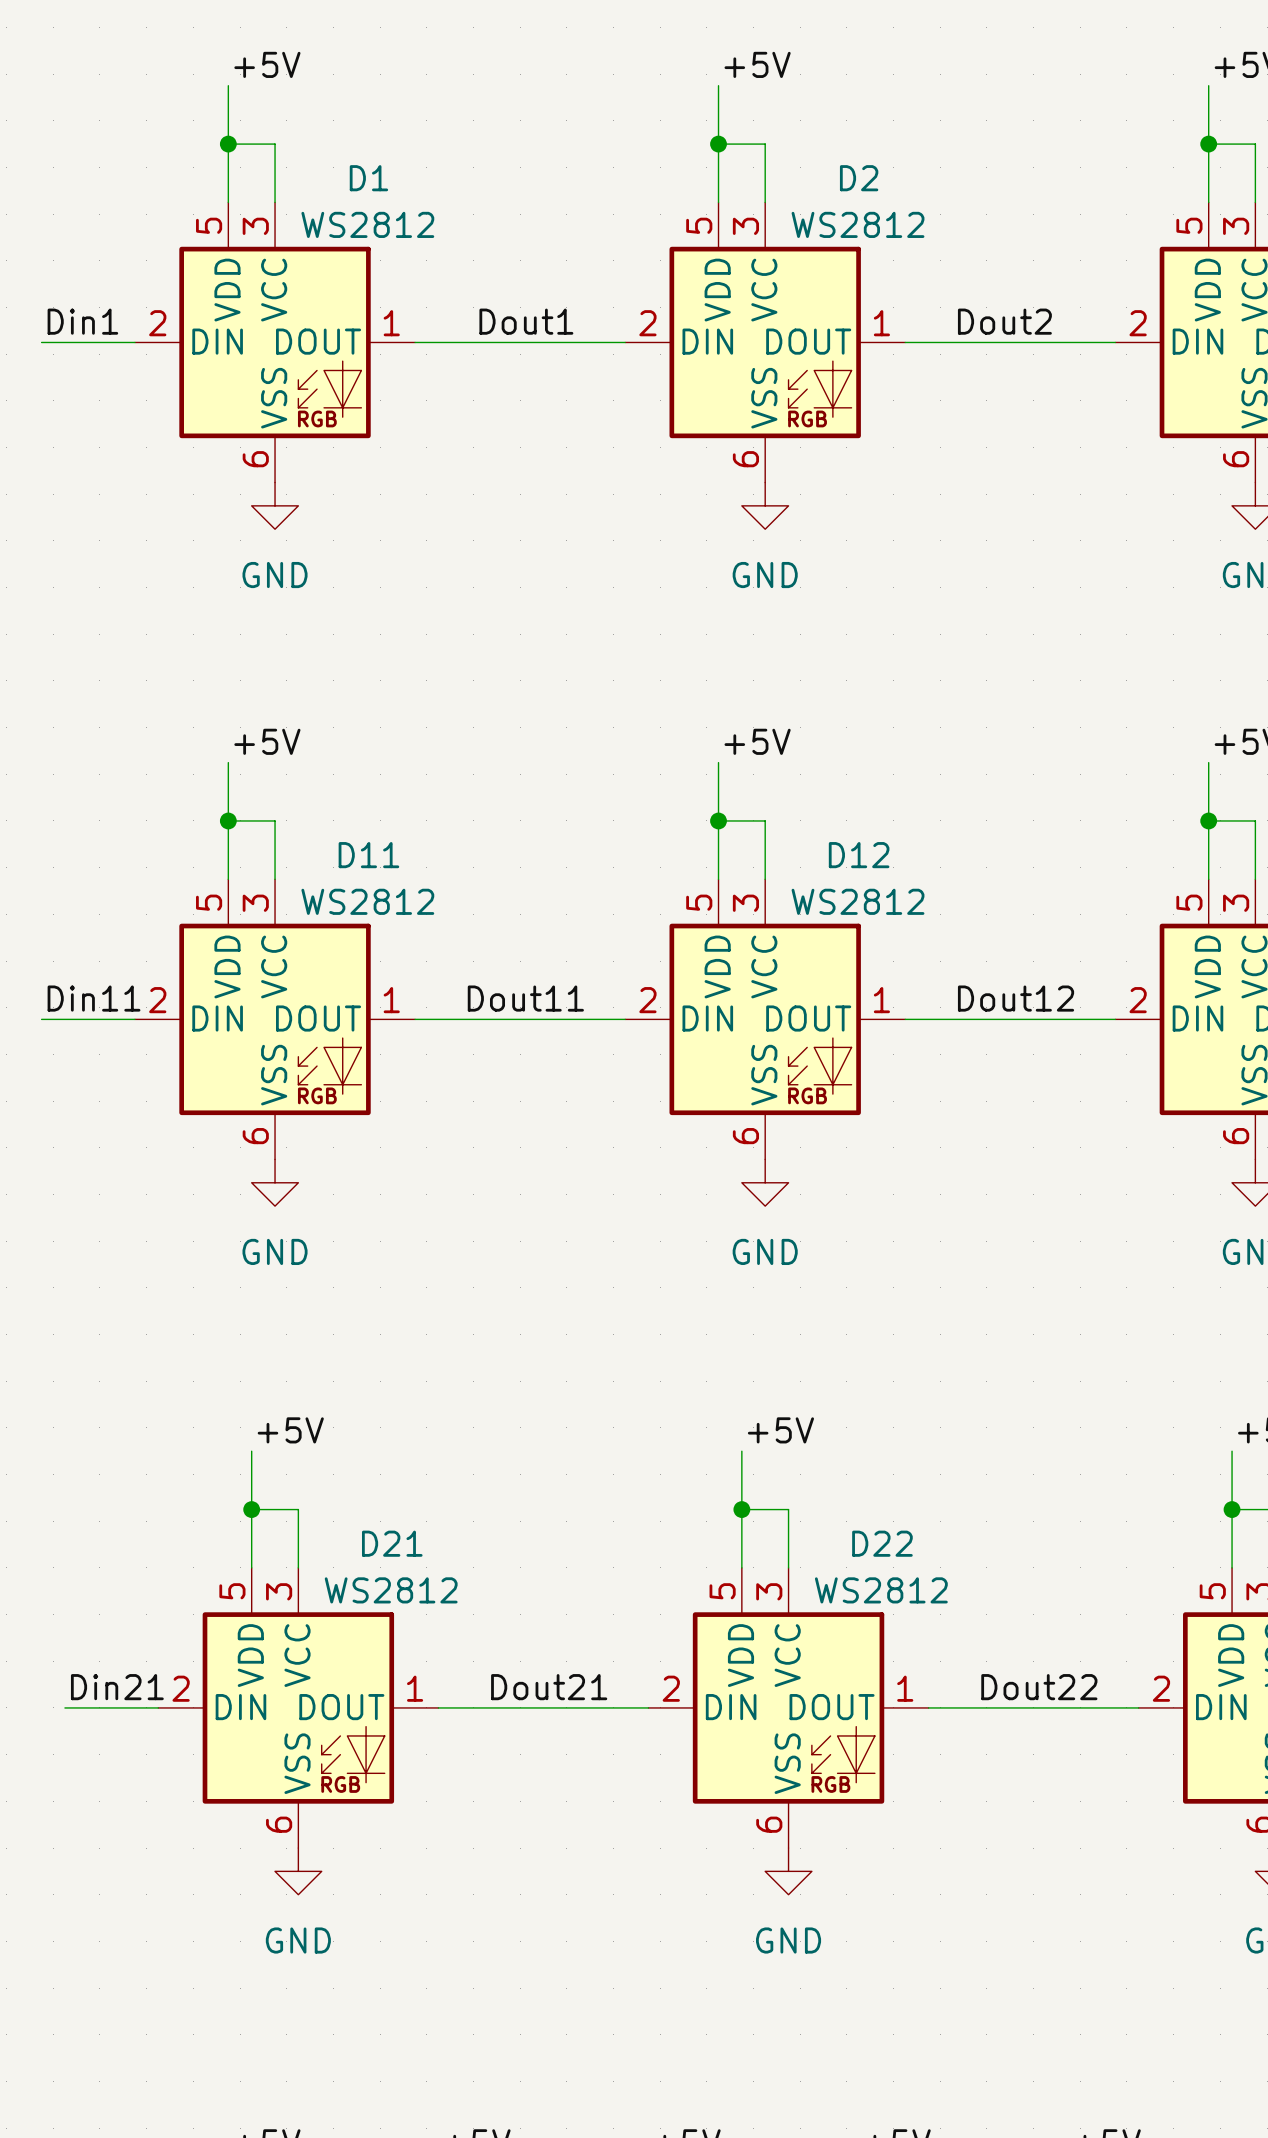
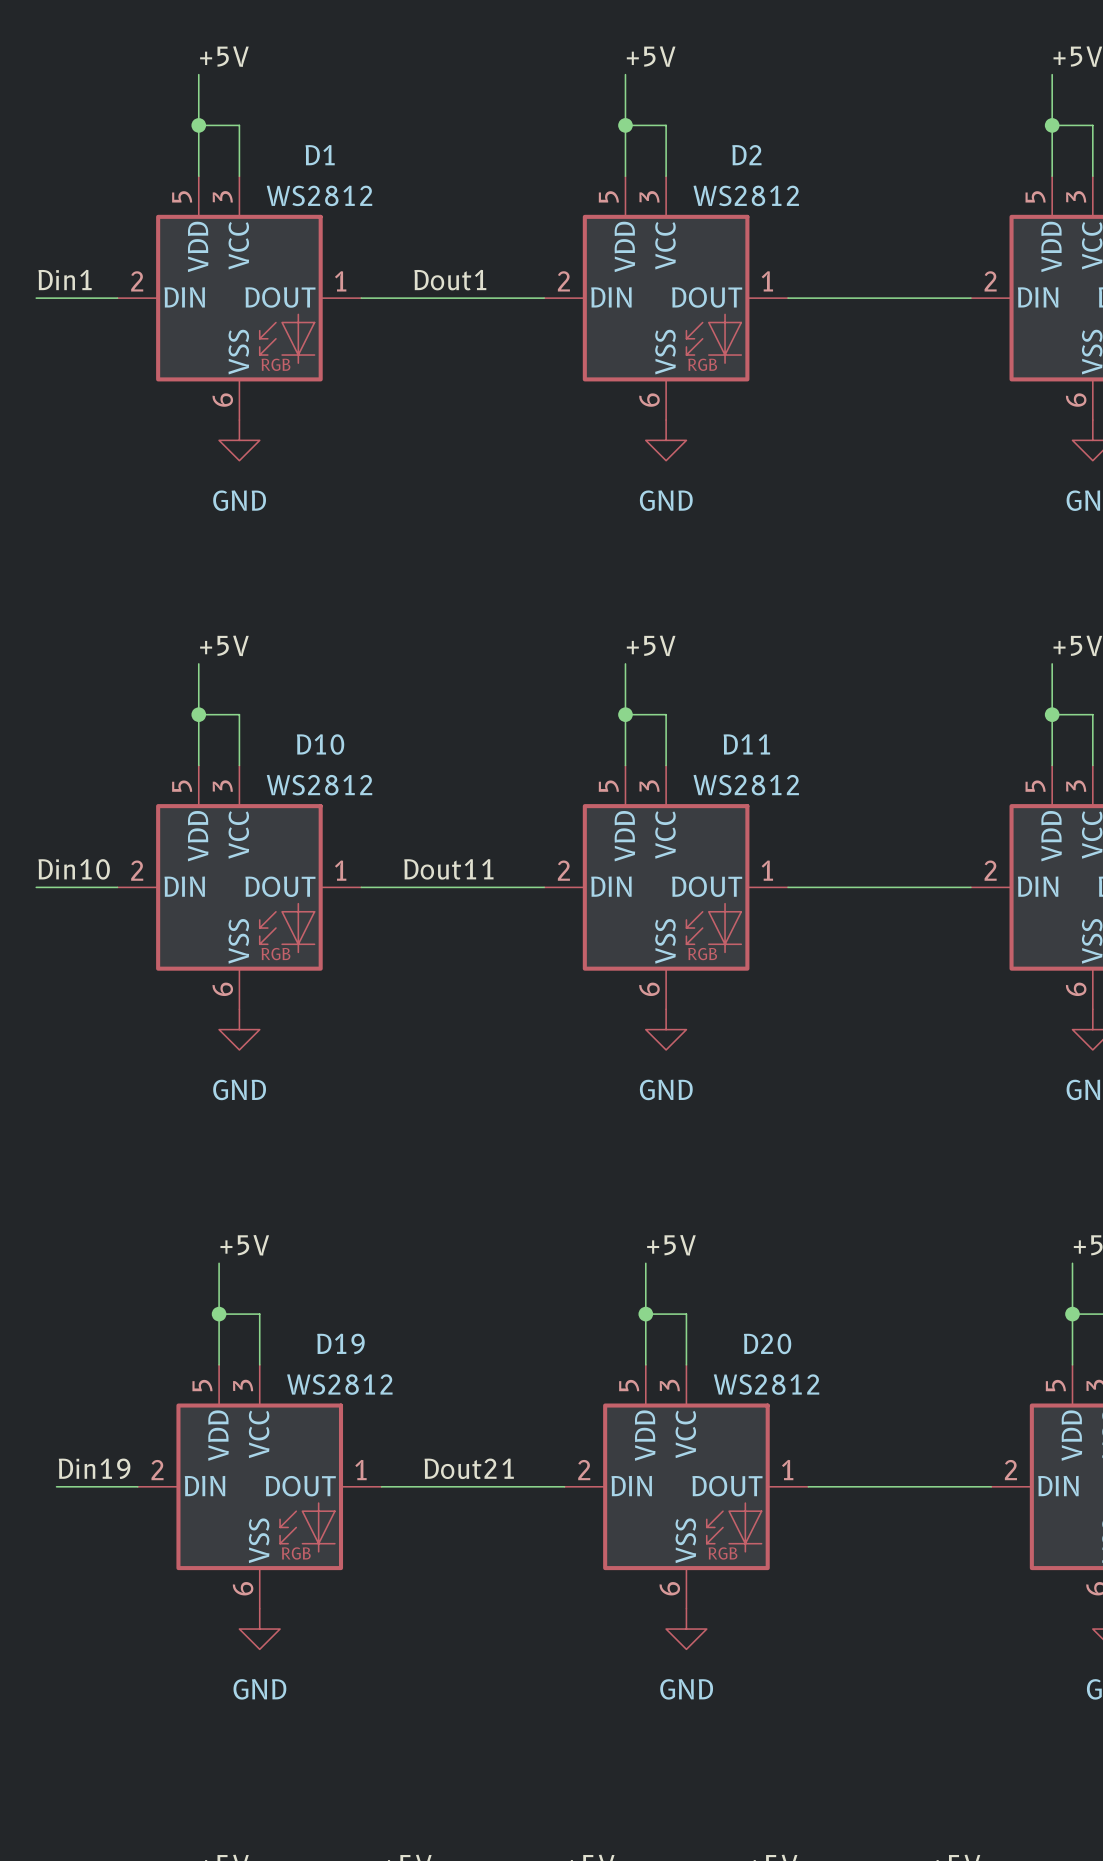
label: Dout2 (1004, 321) -> none
D11 name: D11 (368, 855) -> D10 (320, 744)
D12 name: D12 (859, 855) -> D11 (746, 744)
label: Din11 (94, 998) -> Din10 (74, 869)
label: Dout12 (1016, 998) -> none
D21 name: D21 (392, 1543) -> D19 (340, 1343)
D22 name: D22 (882, 1543) -> D20 (767, 1343)
label: Din21 (117, 1687) -> Din19 (94, 1468)
label: Dout22 (1039, 1687) -> none

